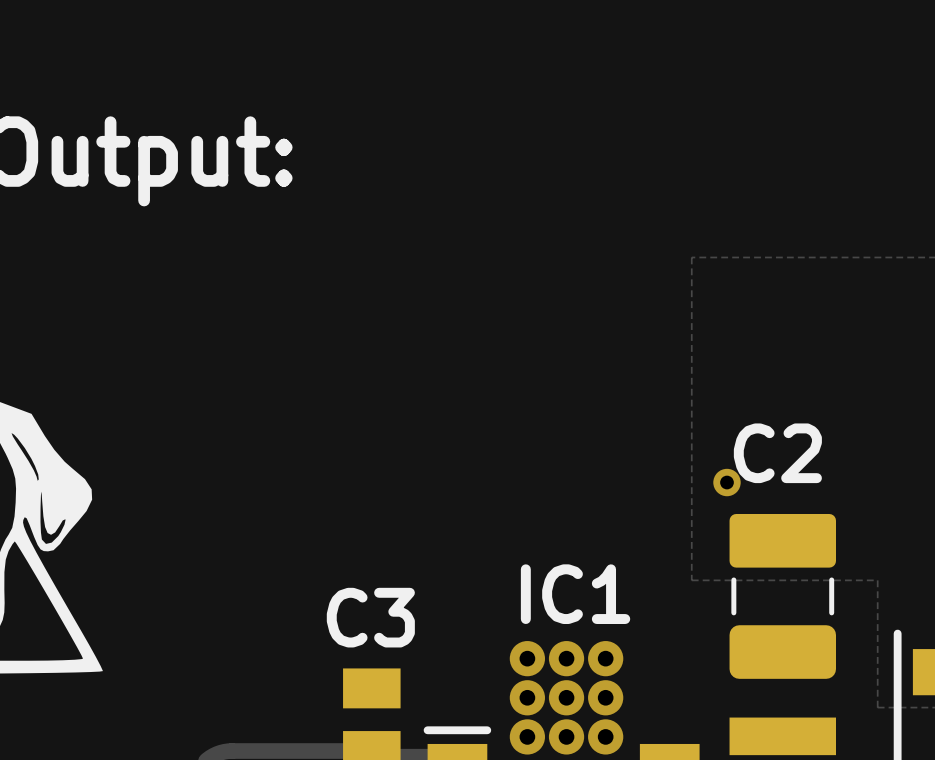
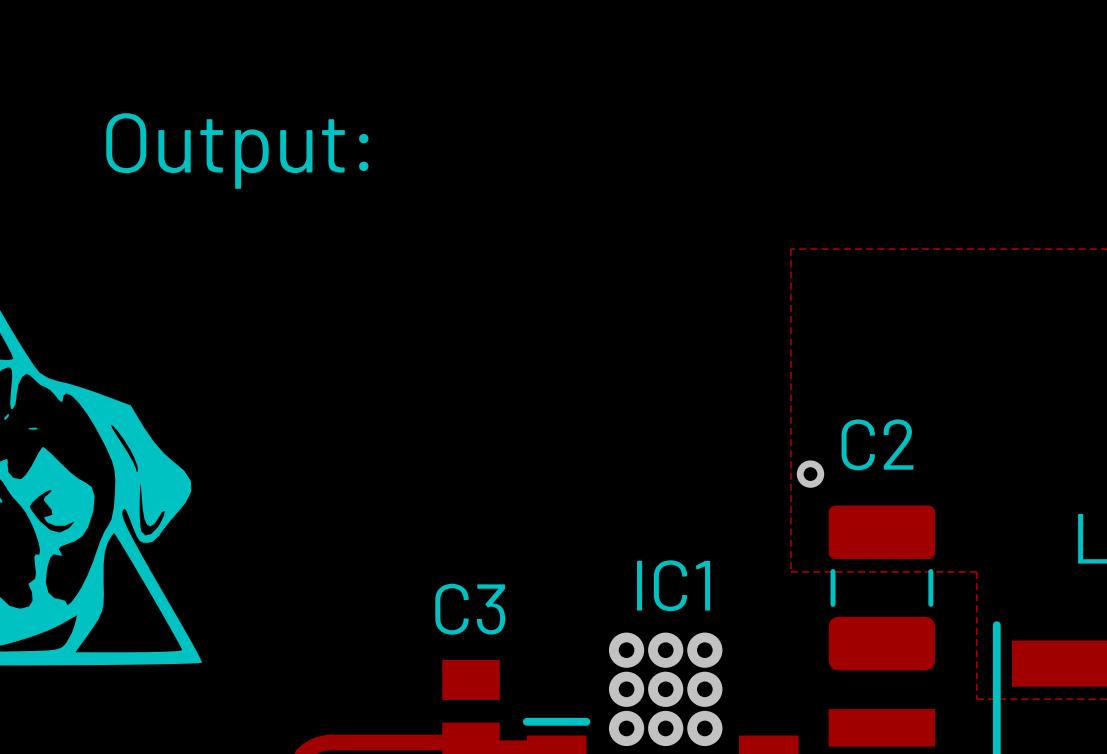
via position: (726, 482) -> (810, 474)

